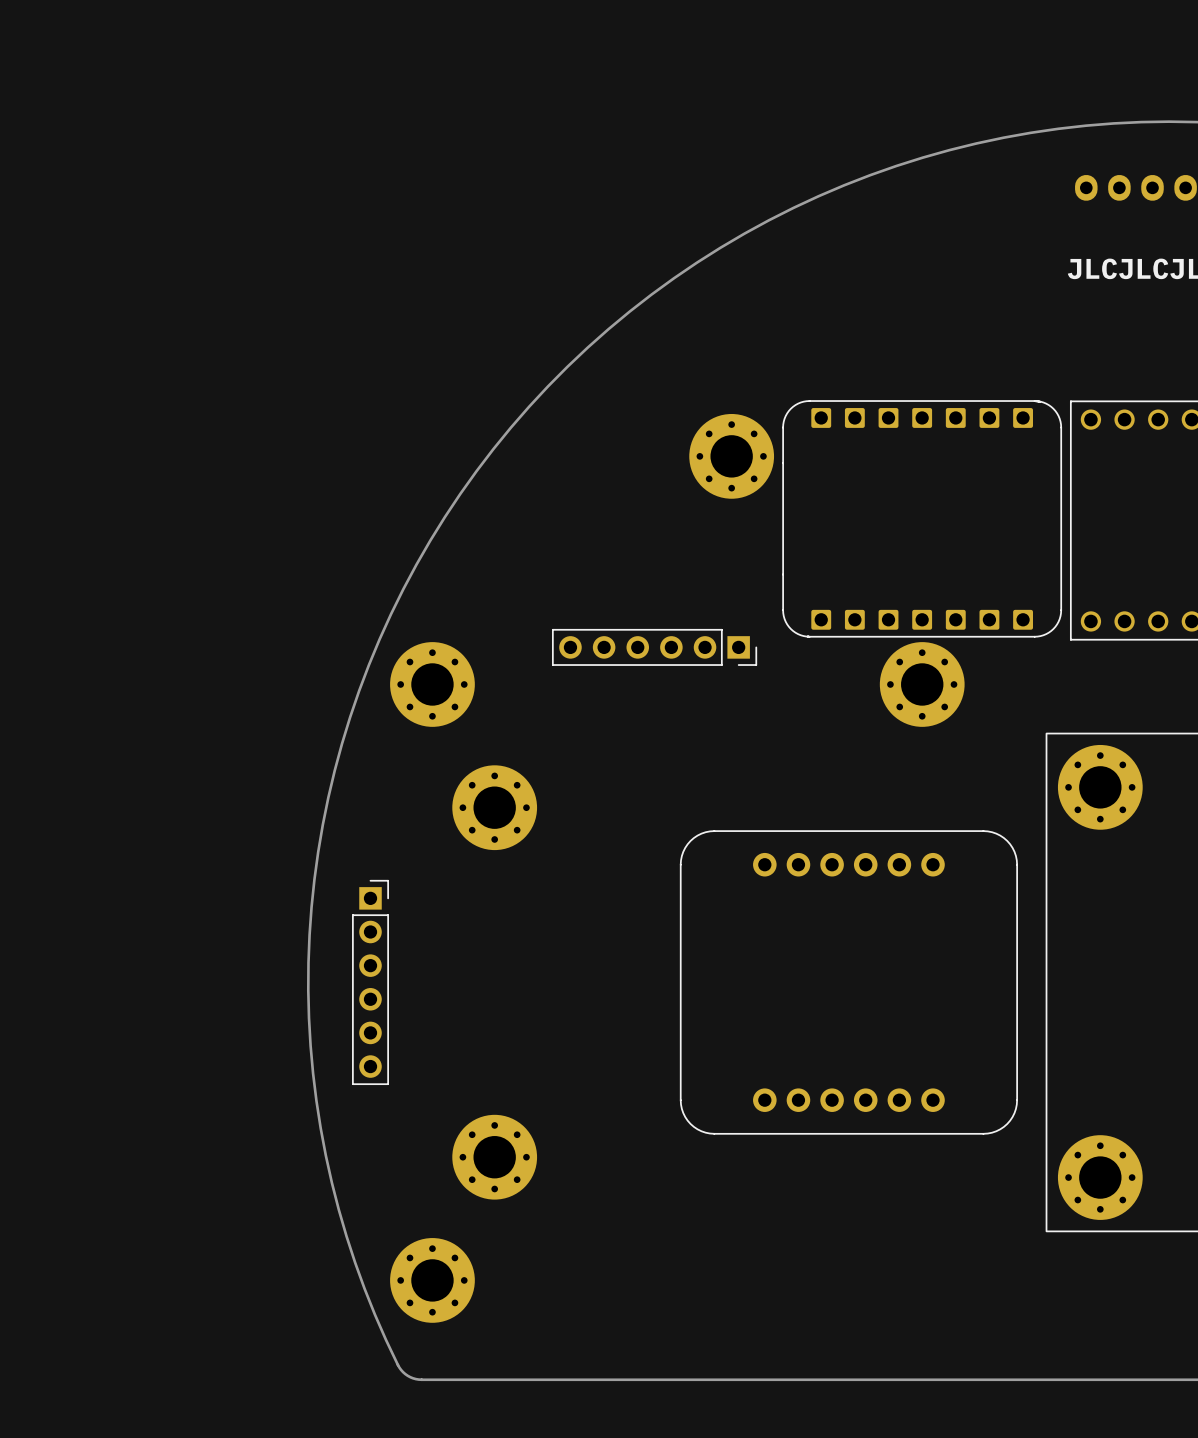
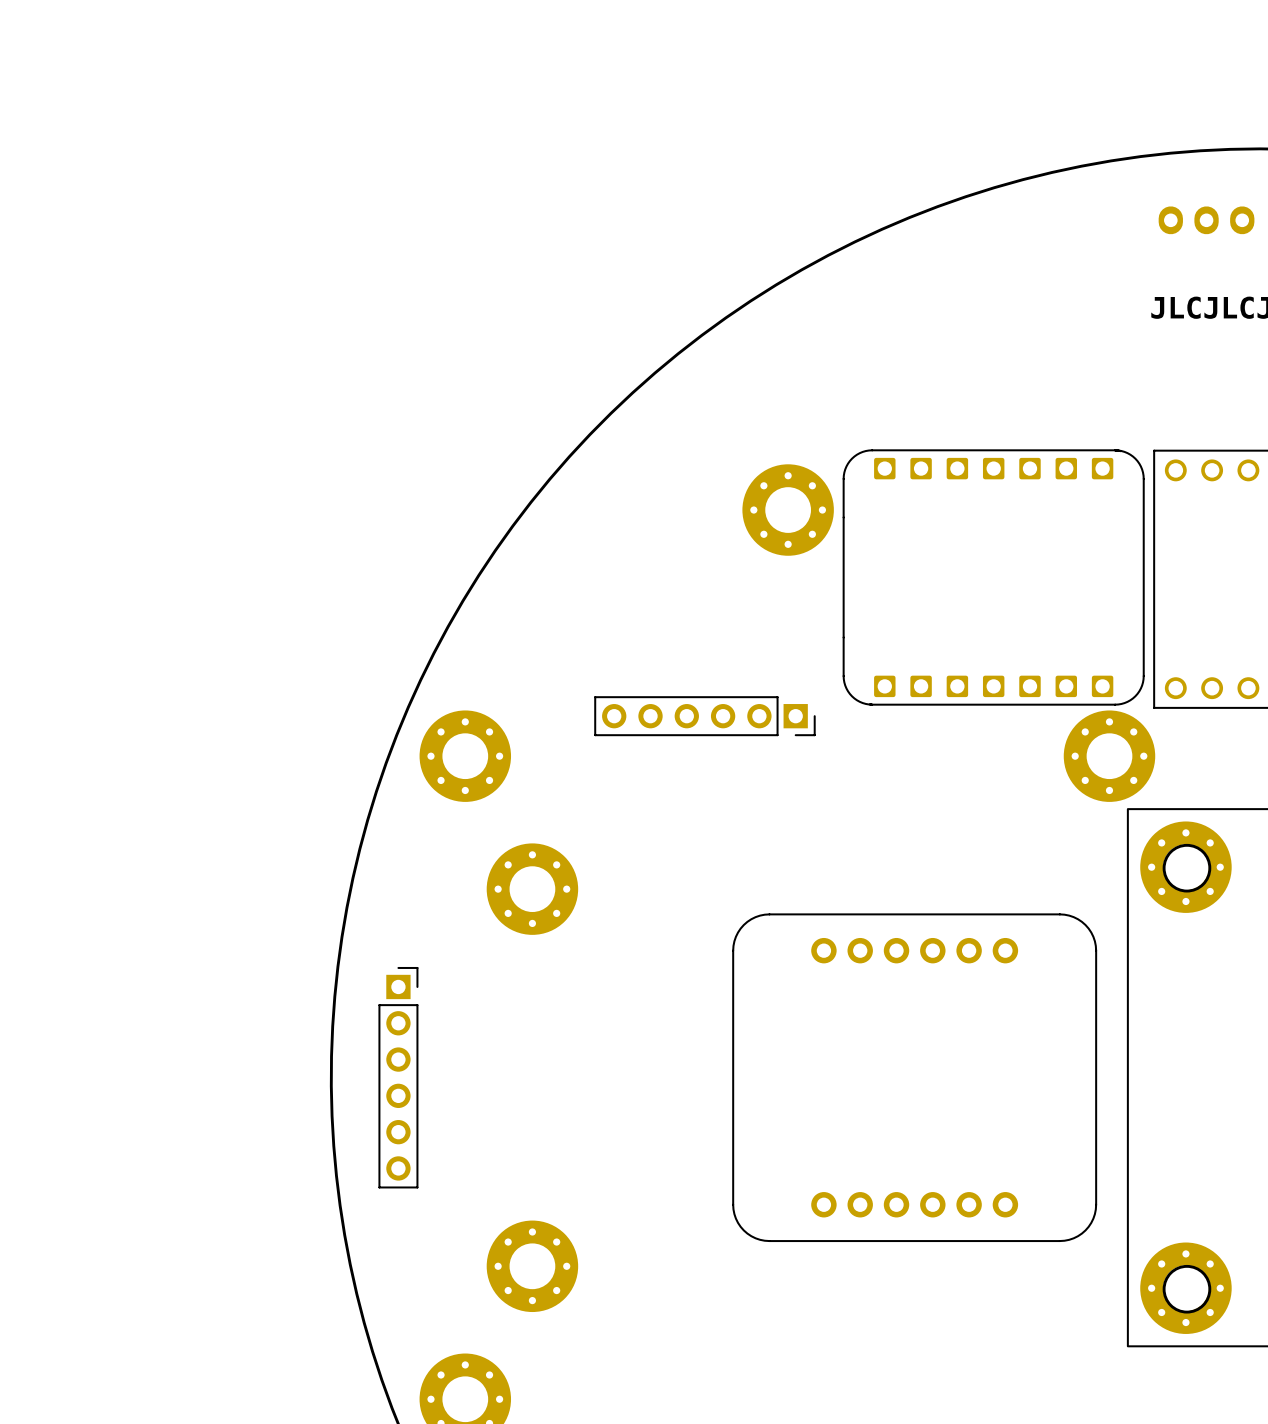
part position: (922, 684) -> (1109, 756)
round board edge: none -> [1162, 843, 1212, 893]
round board edge: none -> [1162, 1264, 1212, 1314]

